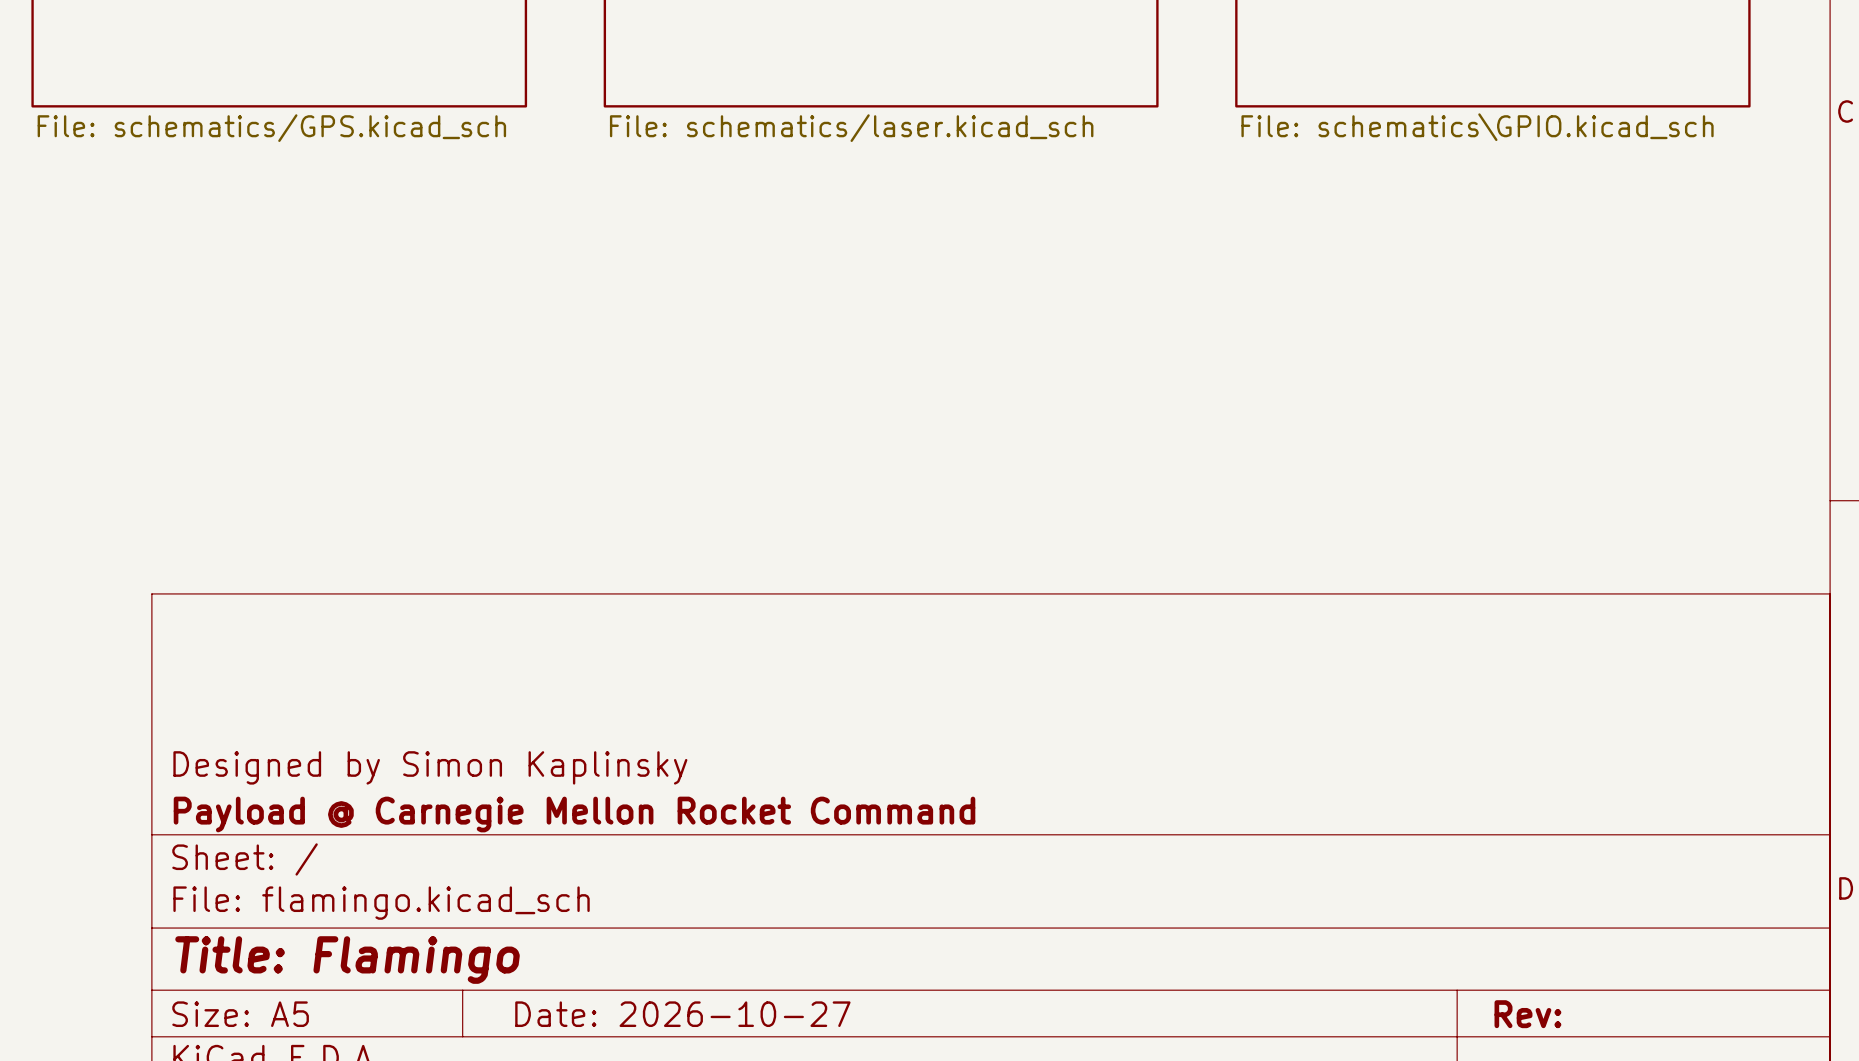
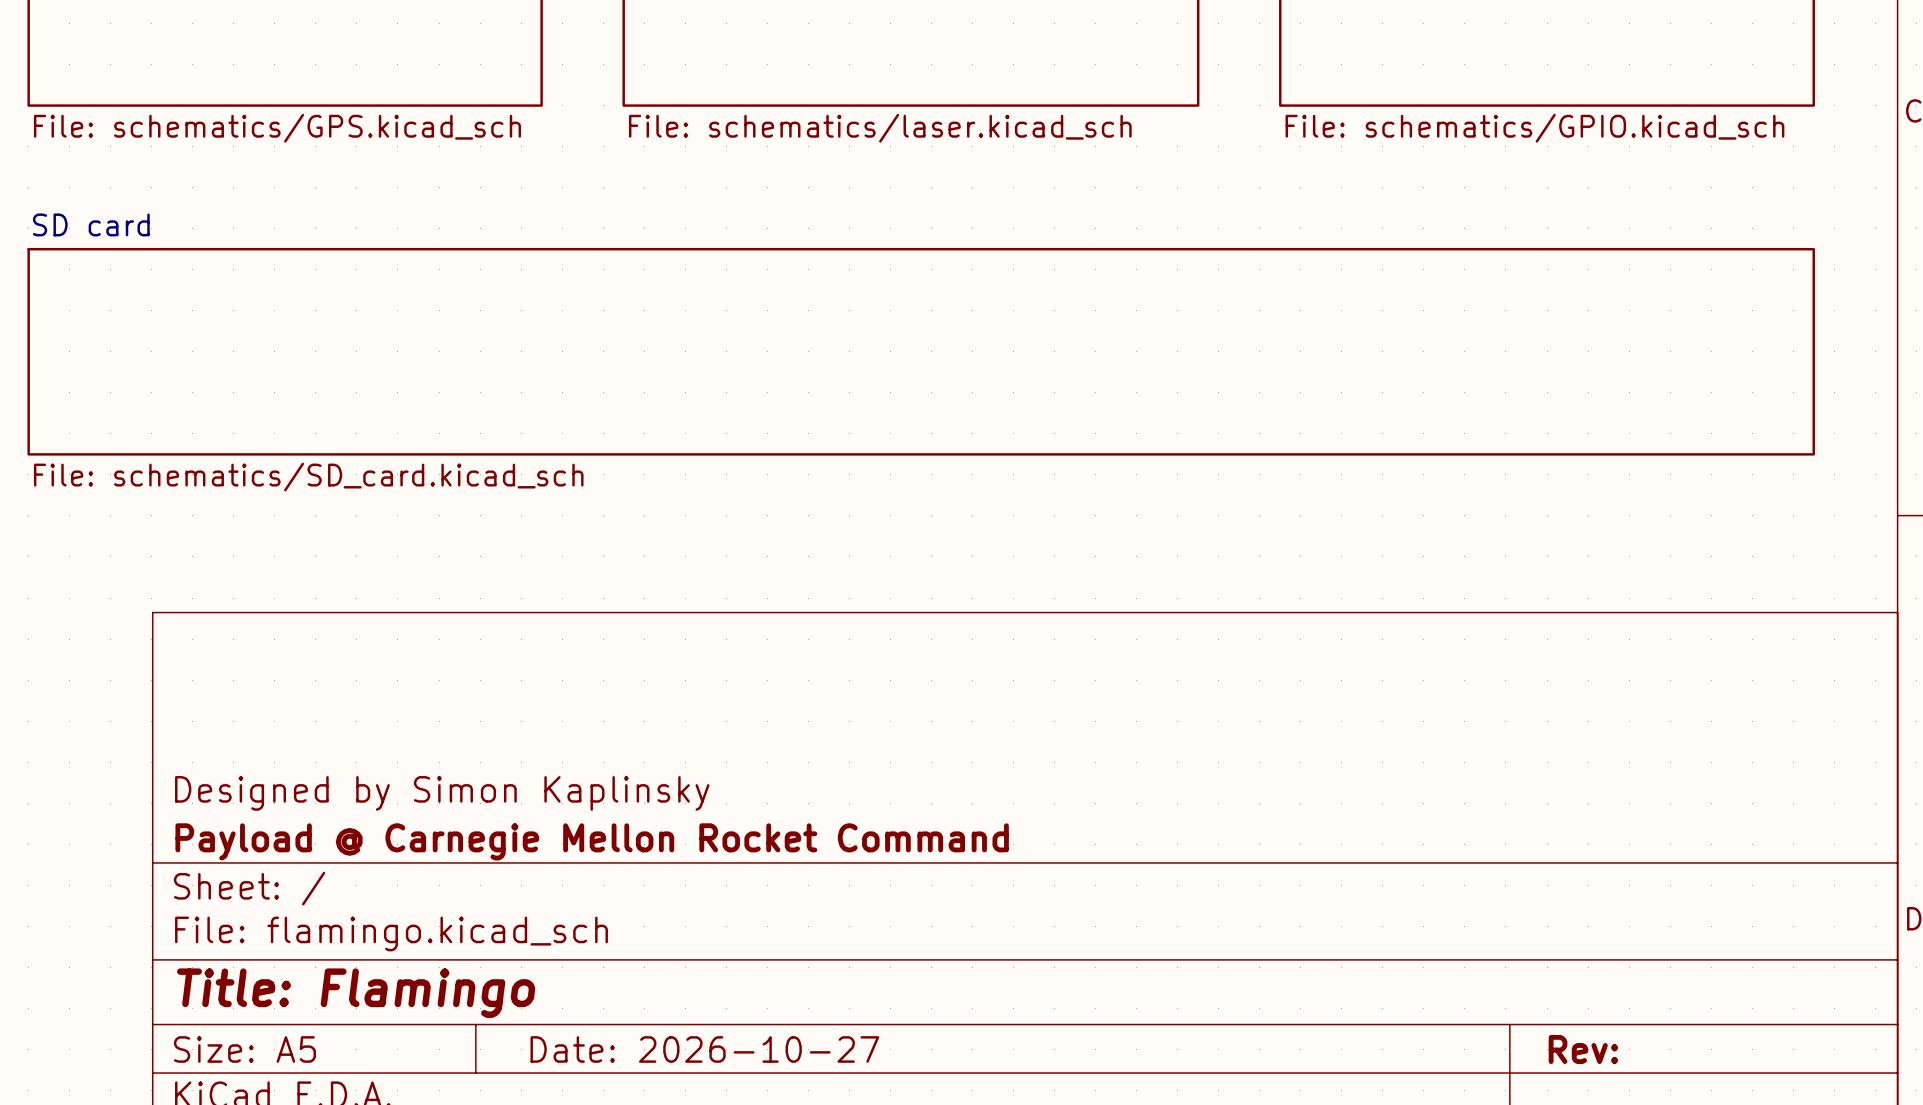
sheet value: File: schematics\GPIO.kicad_sch (1477, 127) -> File: schematics/GPIO.kicad_sch (1534, 128)
sheet SD card: none -> File: schematics/SD_card.kicad_sch (921, 351)

